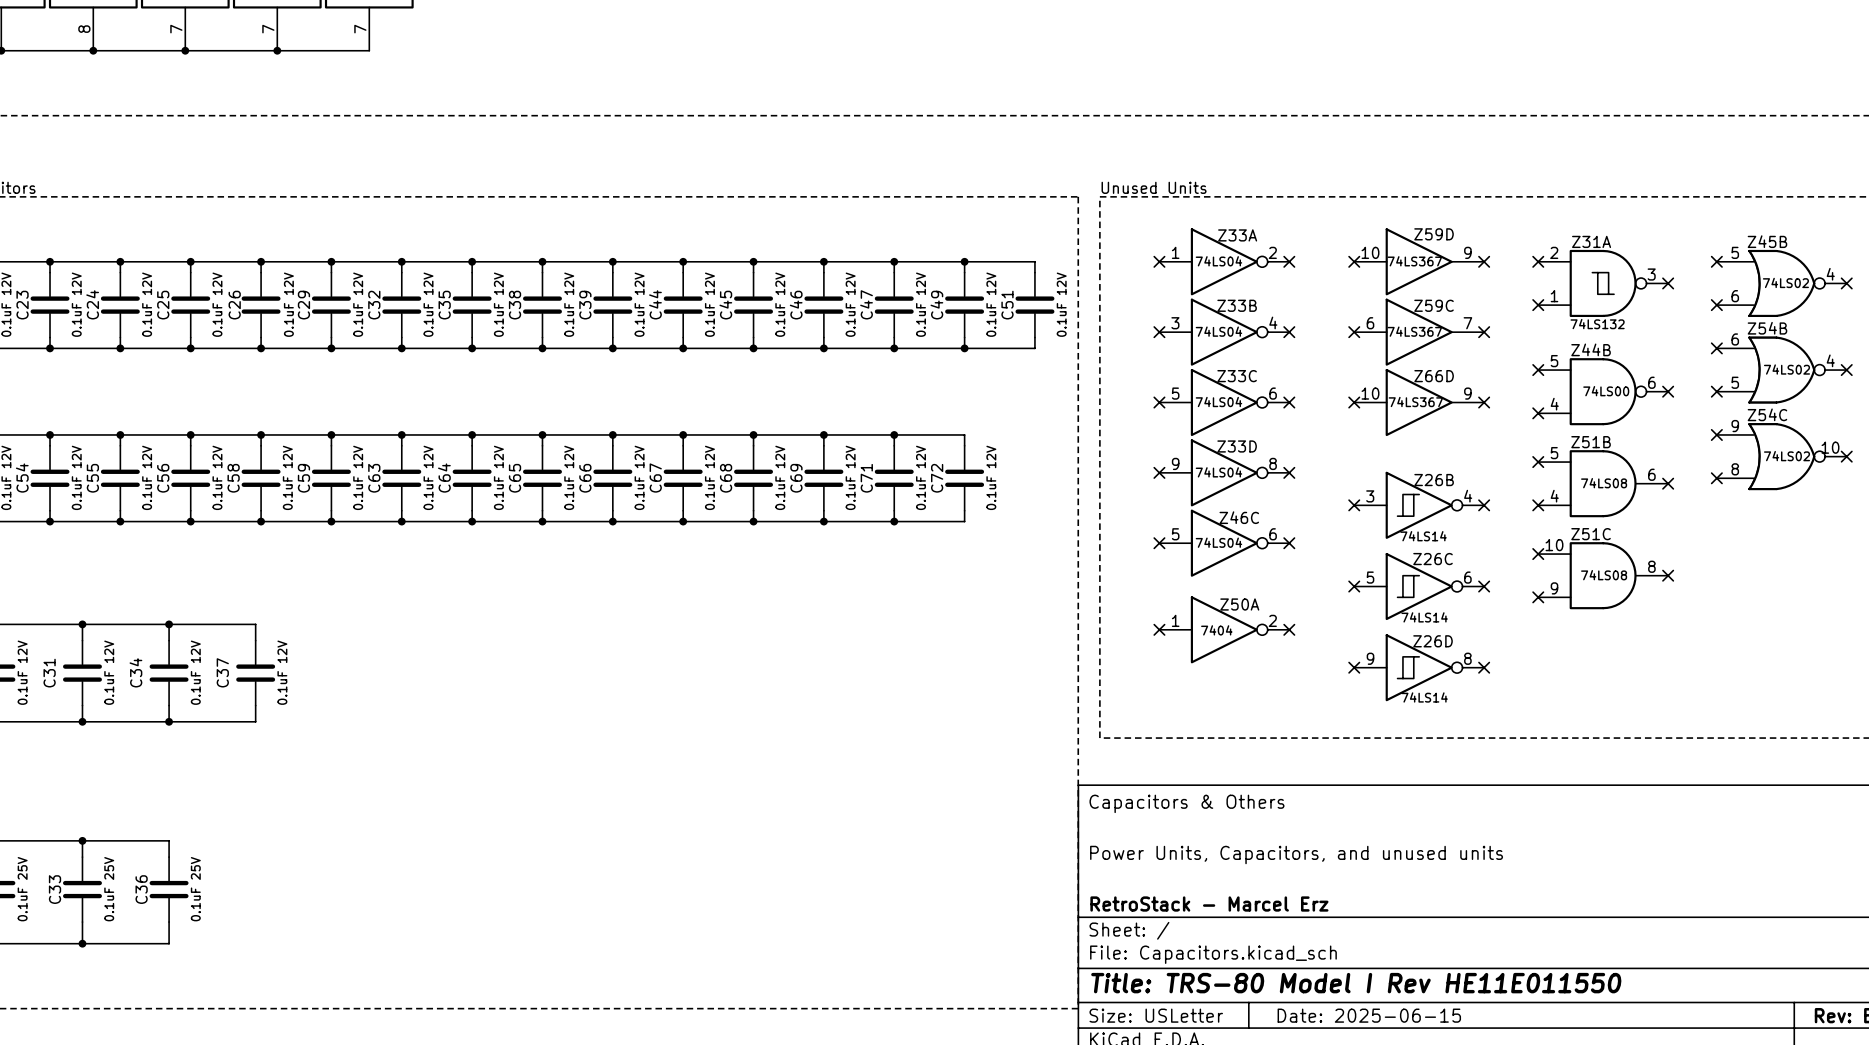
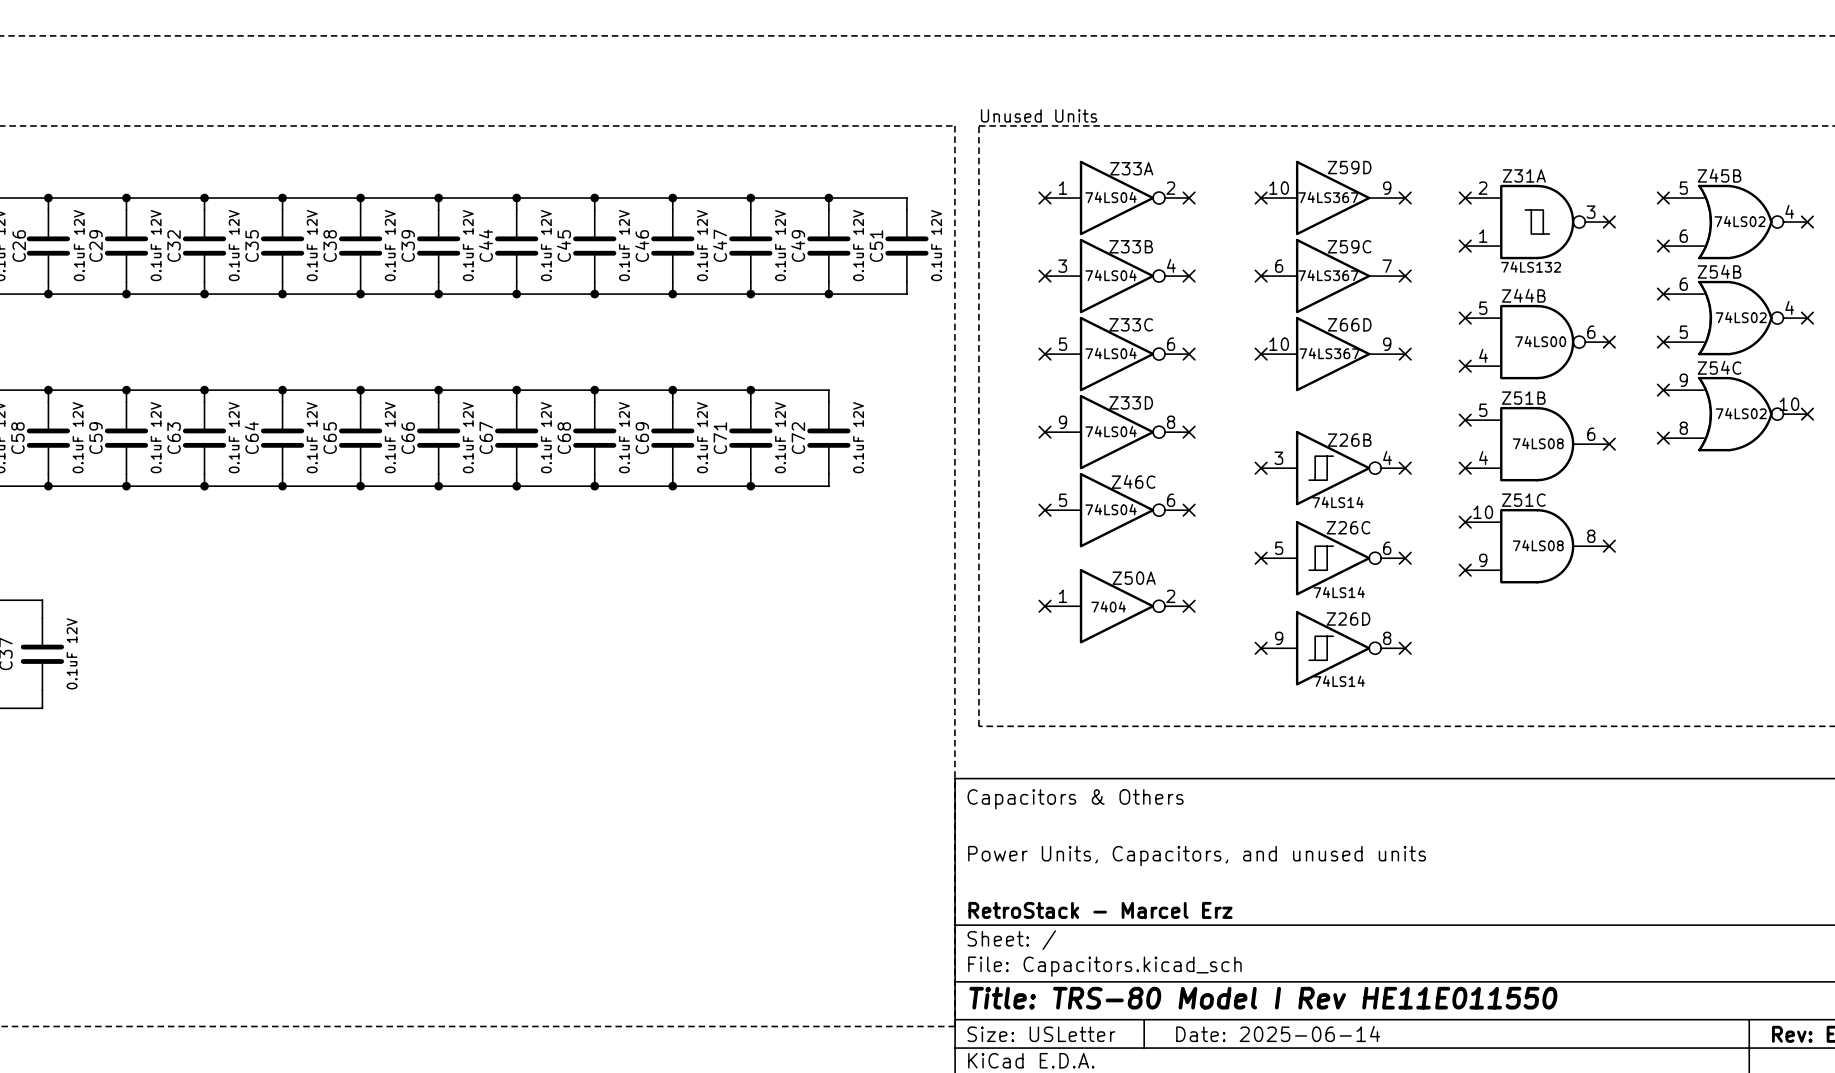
title block: Date: 2025-06-15 (1369, 1015) -> Date: 2025-06-14 (1278, 1033)

